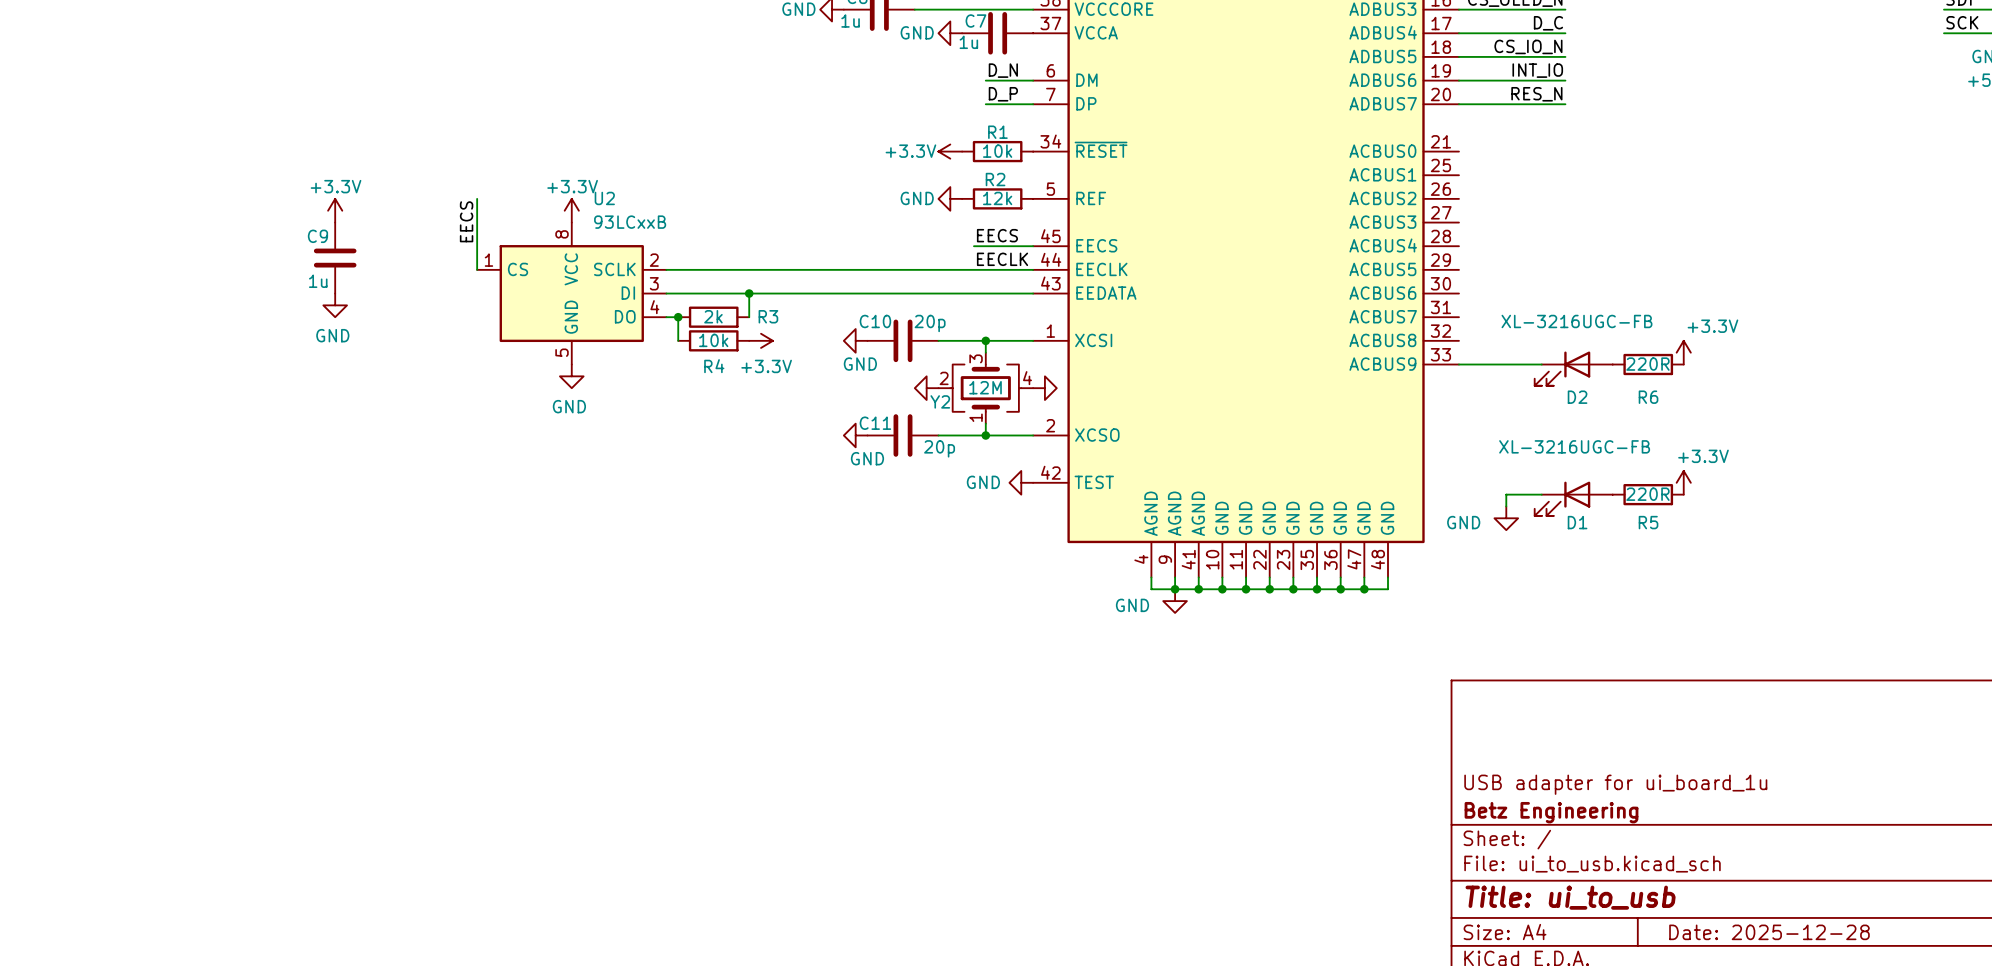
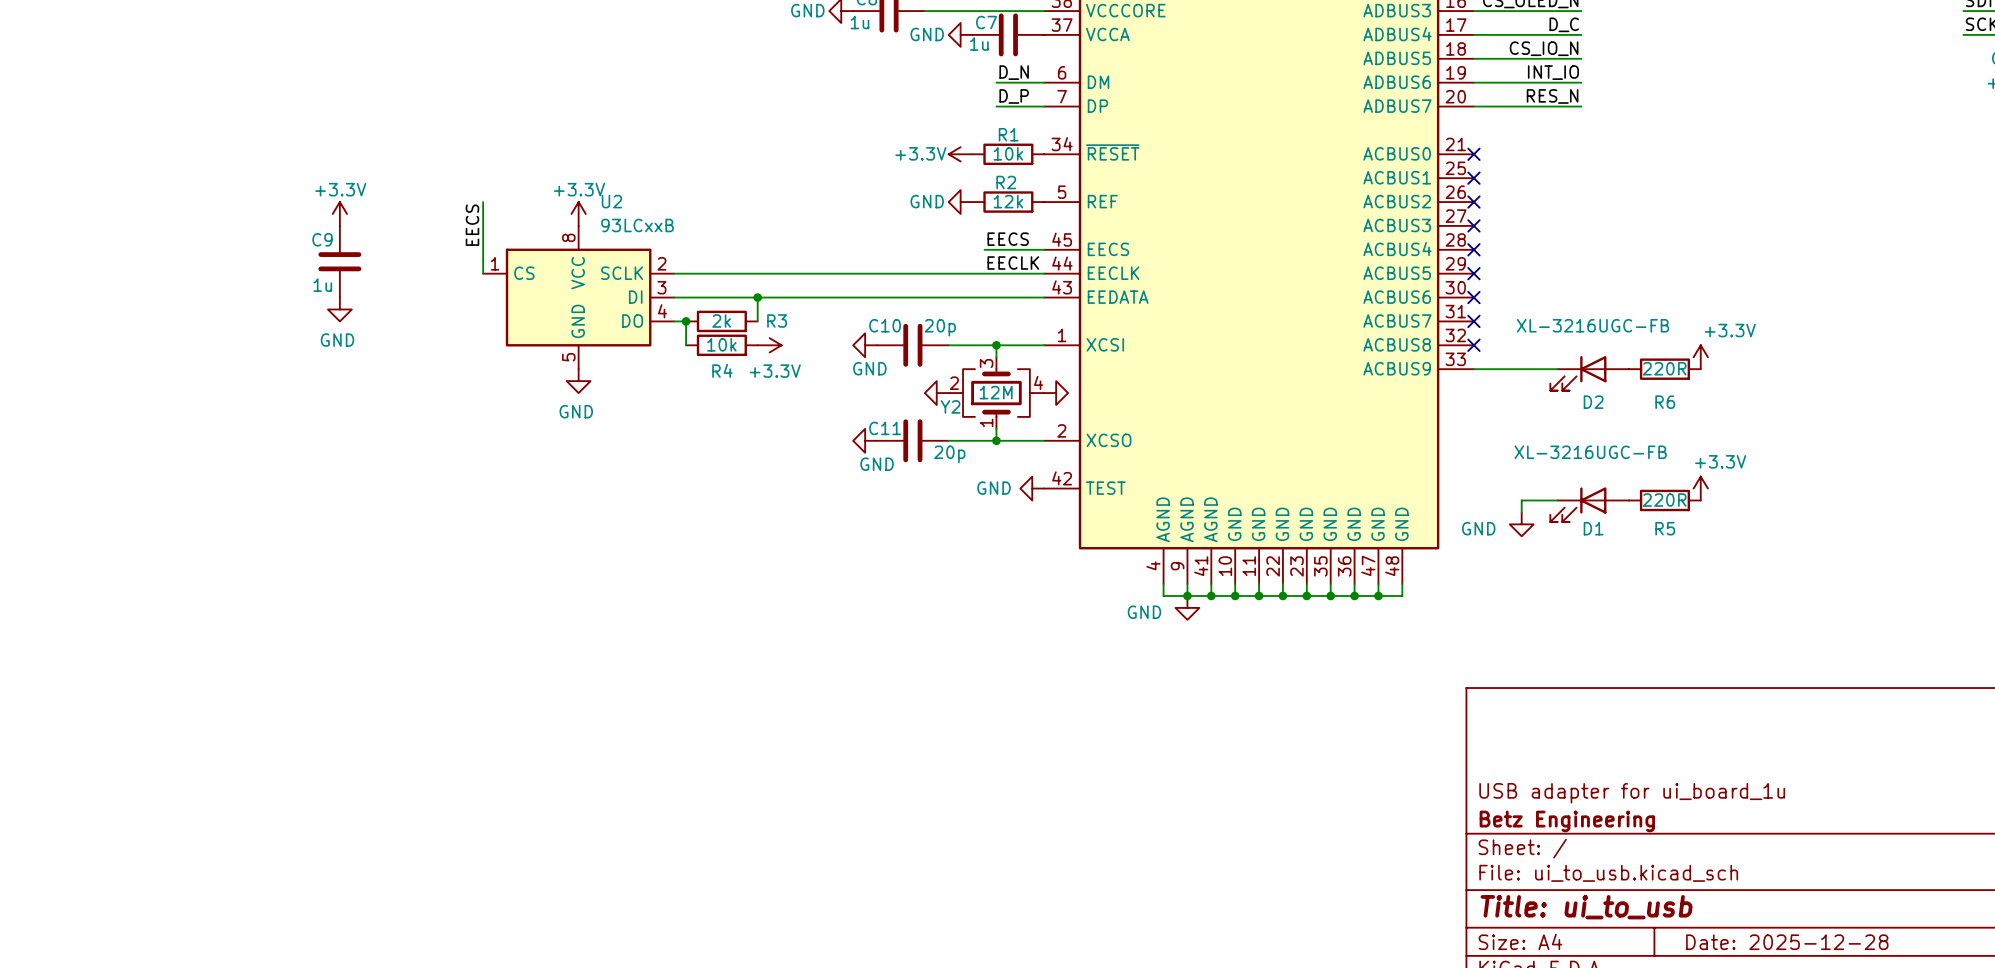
no-connect mark: none -> (1473, 154)
no-connect mark: none -> (1473, 178)
no-connect mark: none -> (1473, 202)
no-connect mark: none -> (1473, 225)
no-connect mark: none -> (1473, 249)
no-connect mark: none -> (1473, 273)
no-connect mark: none -> (1473, 297)
no-connect mark: none -> (1473, 321)
no-connect mark: none -> (1473, 345)

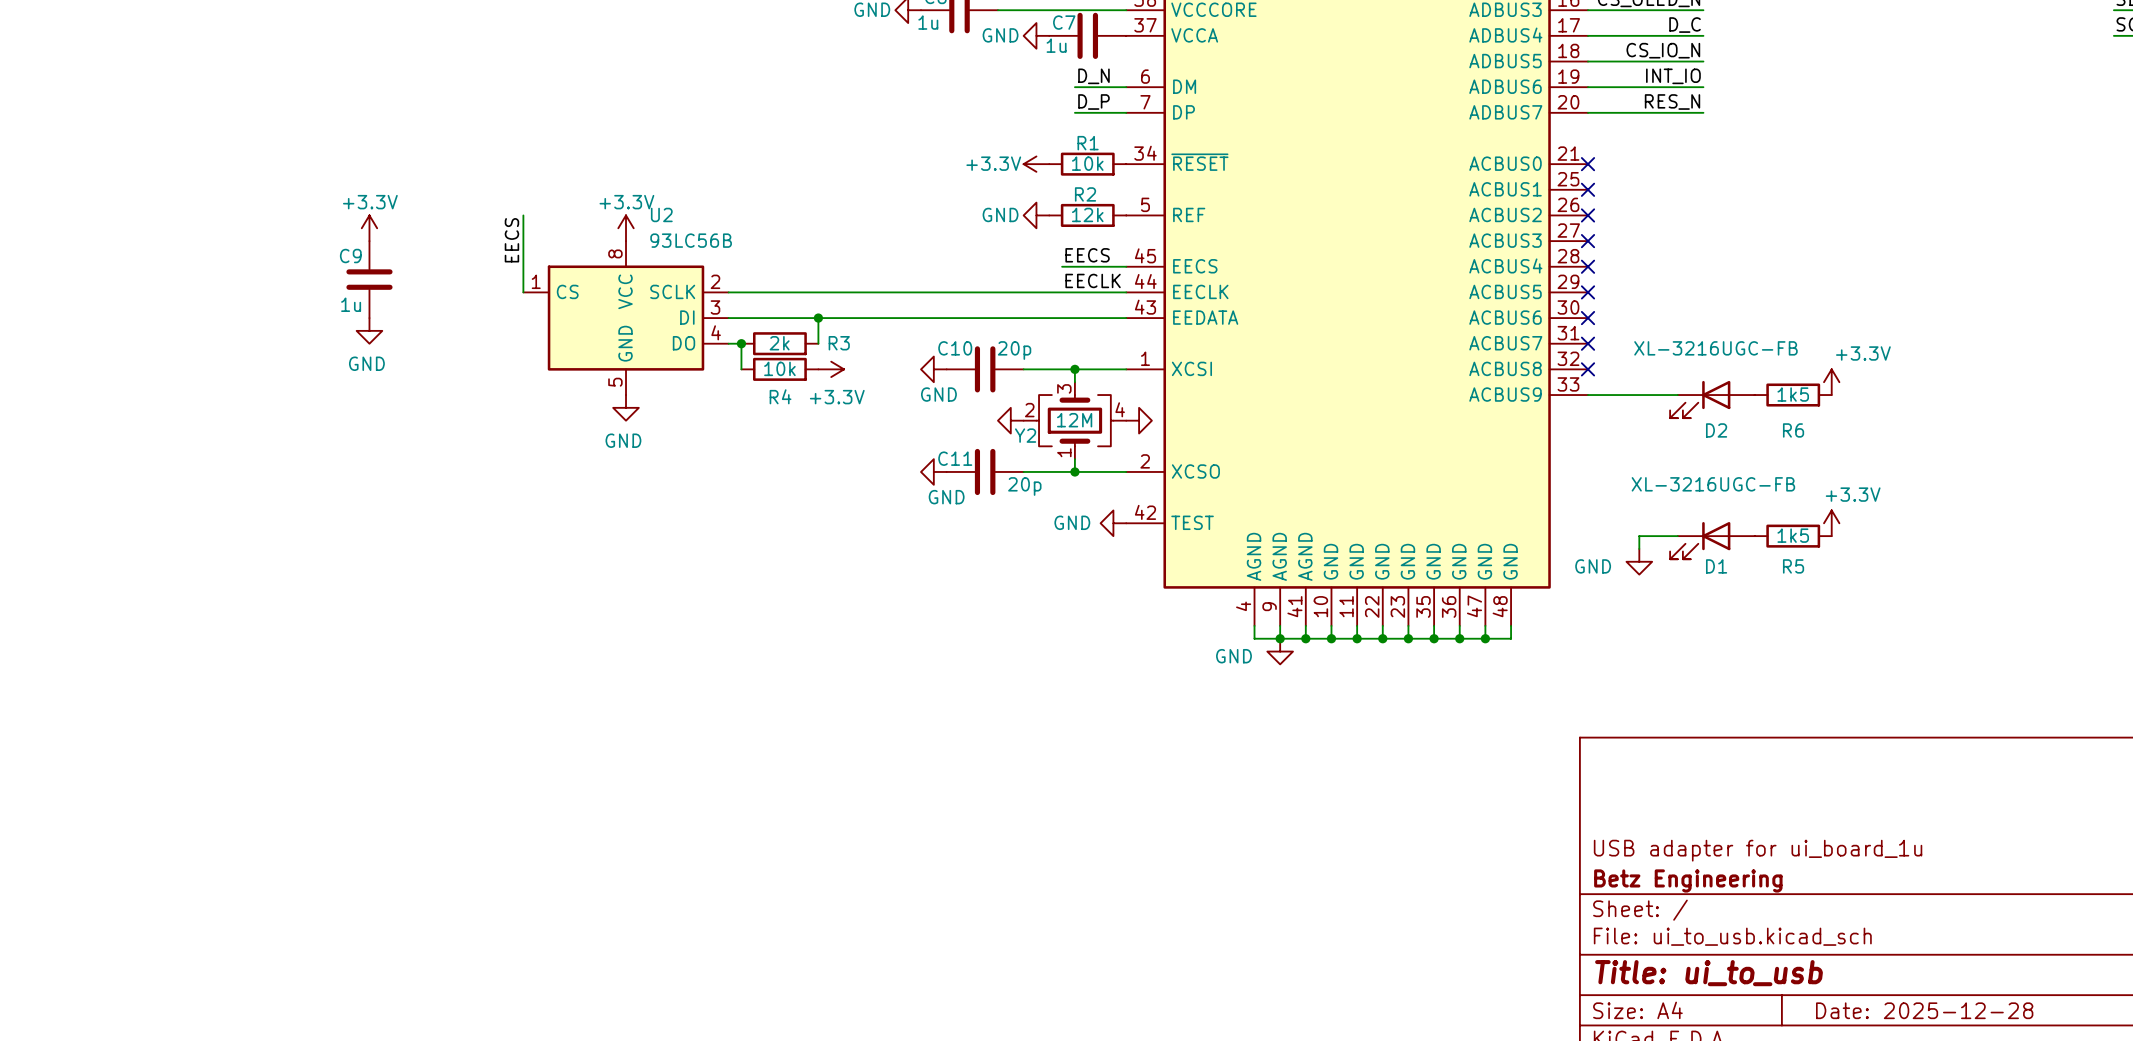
U2 value: 93LCxxB (637, 225) -> 93LC56B (691, 240)
R6 value: 220R (1664, 368) -> 1k5 (1793, 394)
R5 value: 220R (1664, 500) -> 1k5 (1793, 535)

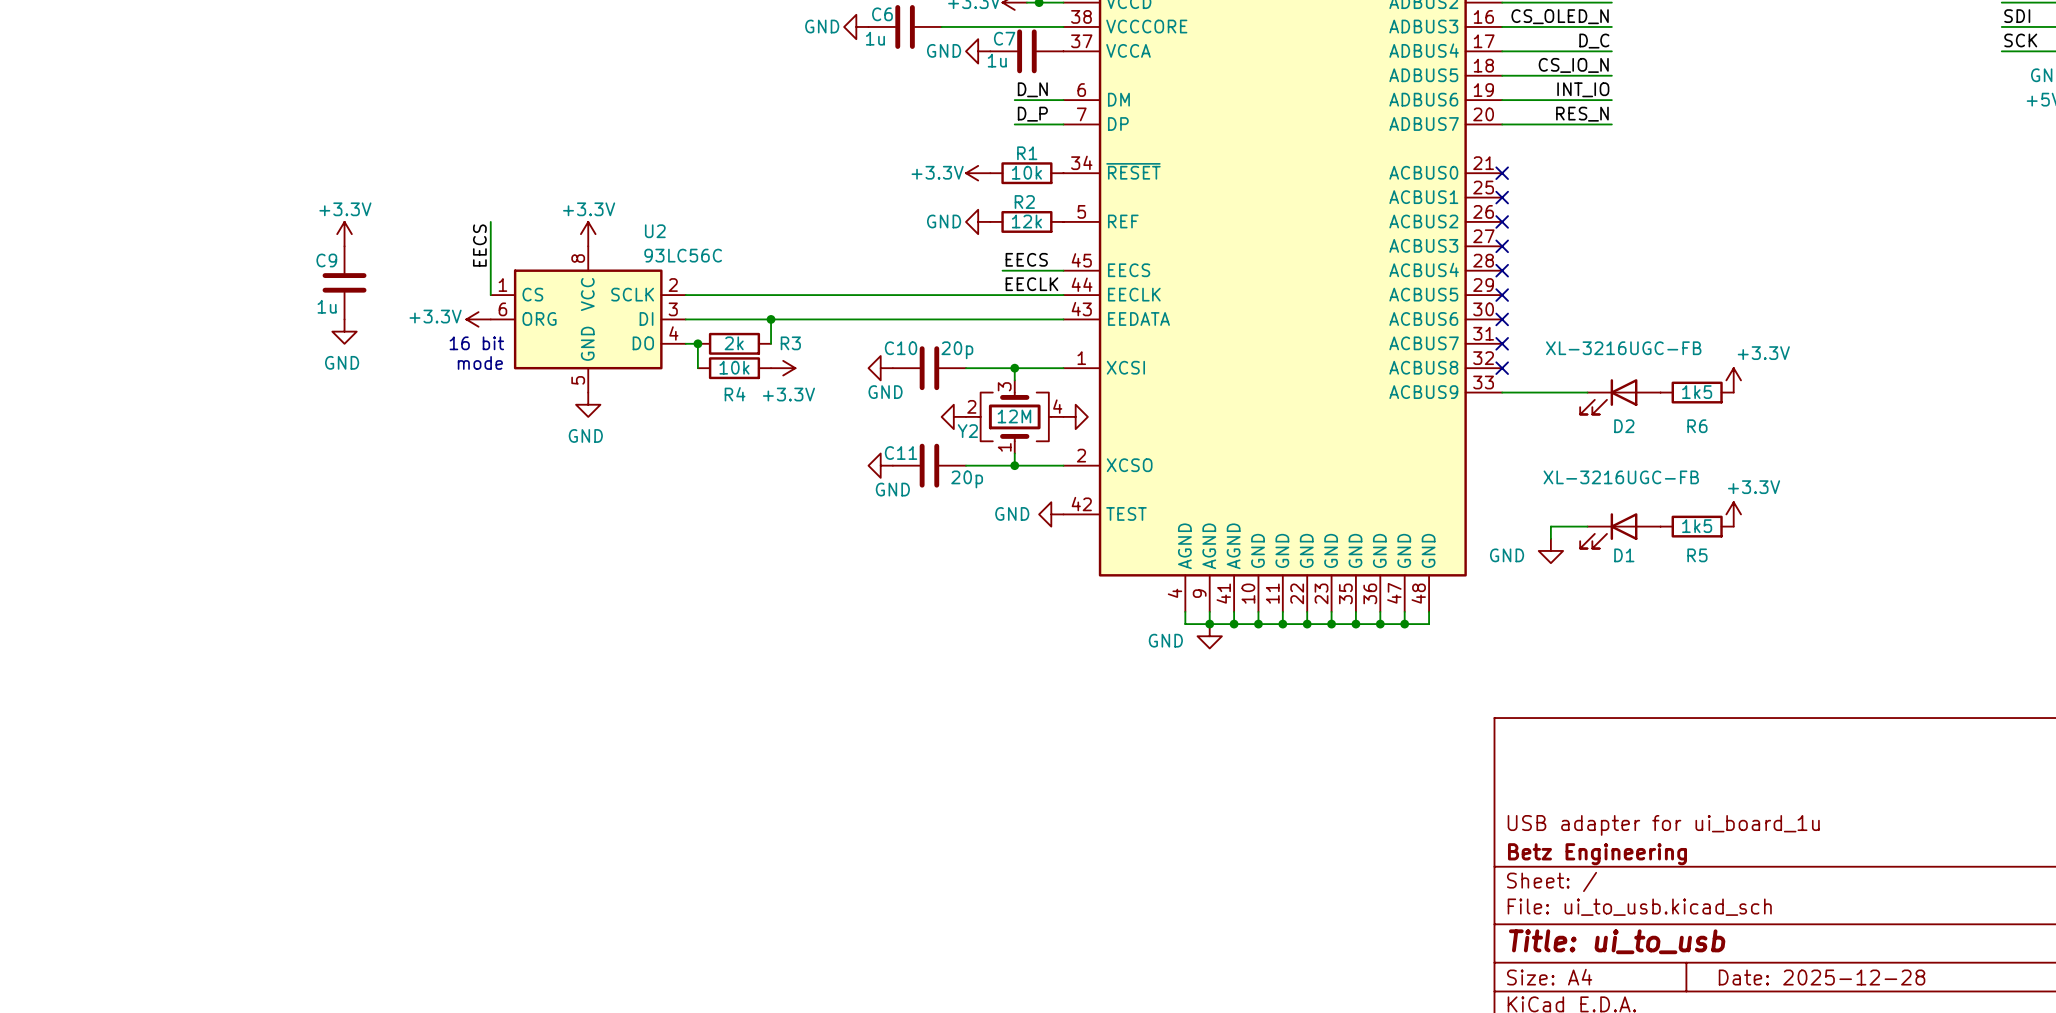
U2 name position: U2 (661, 214) -> U2 (655, 231)
U2 value: 93LC56B (691, 240) -> 93LC56C (683, 255)
U2 symbol: [523, 241, 729, 396] -> [490, 246, 686, 393]
power symbol: none -> +3.3V (478, 319)
text: none -> 16 bit (476, 343)
text: none -> mode (480, 362)

